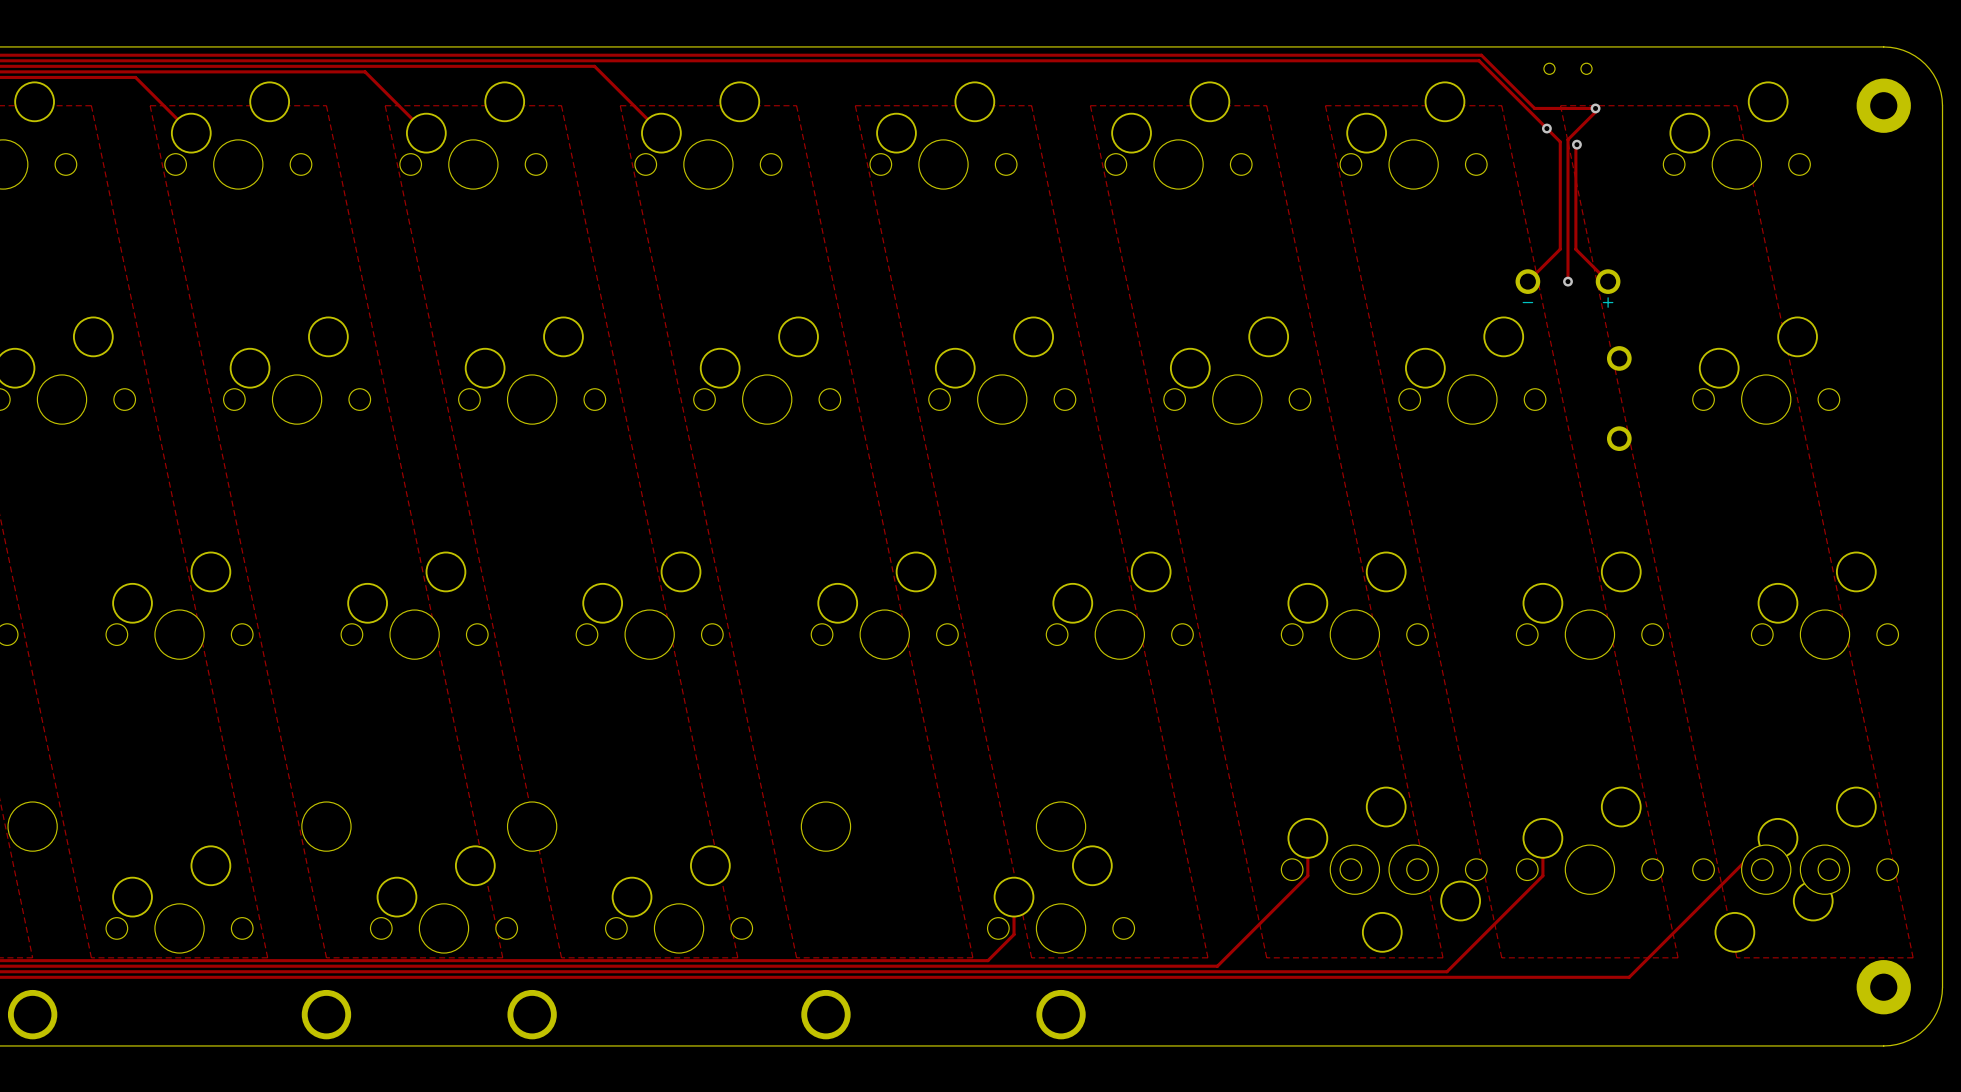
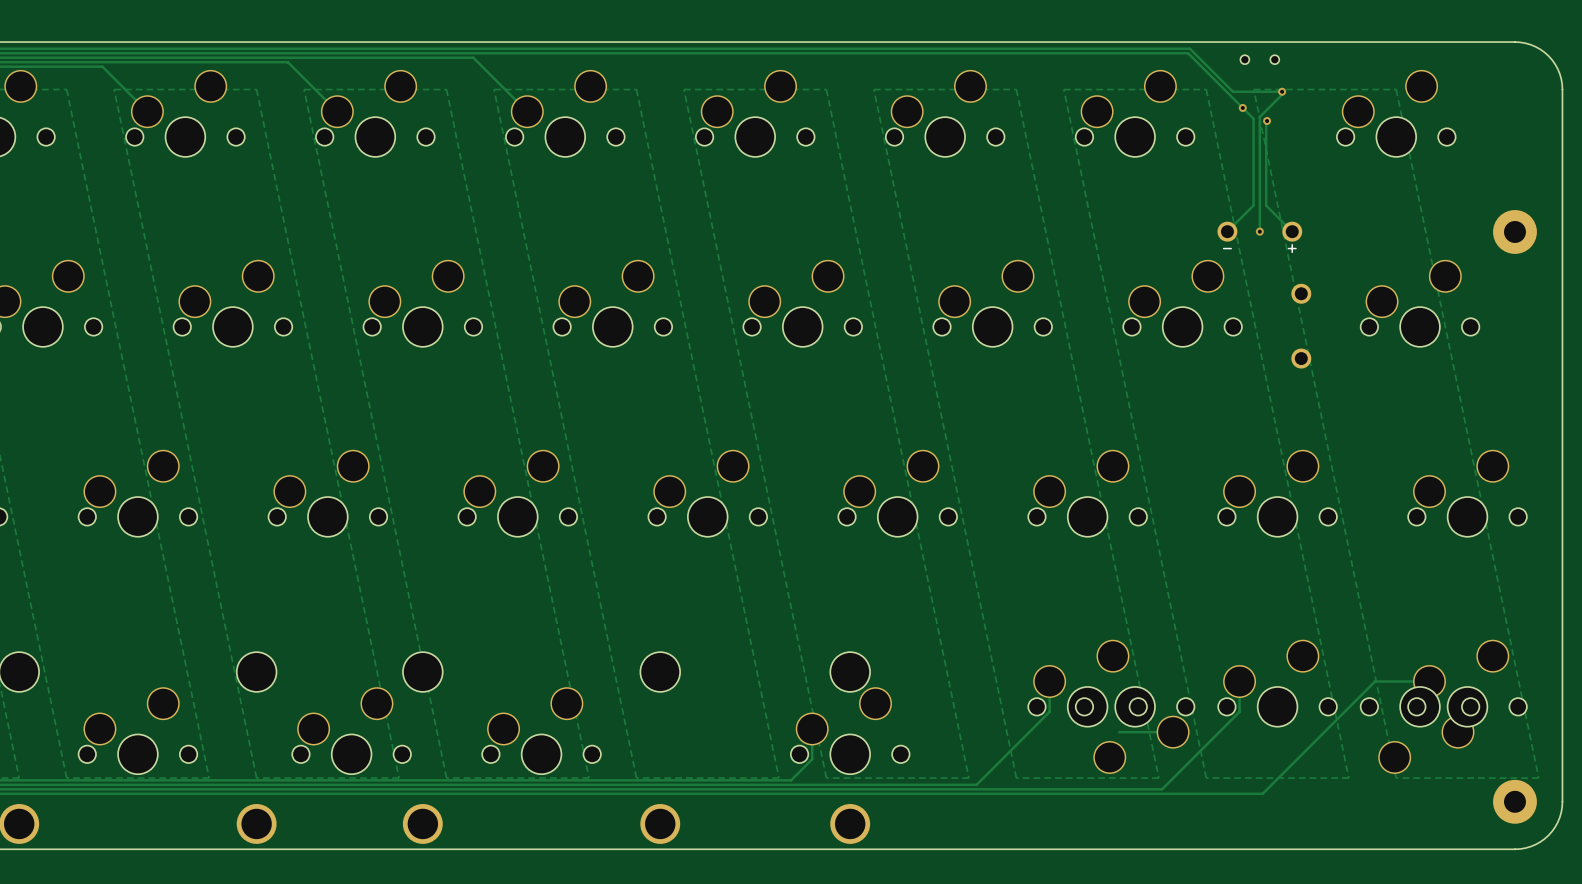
part position: (1883, 105) -> (1514, 231)
track: (1768, 838) (1629, 977) (1571, 977) -> (1421, 681) (1375, 681) (1262, 793)
track: none -> (1119, 732) (1173, 732)

